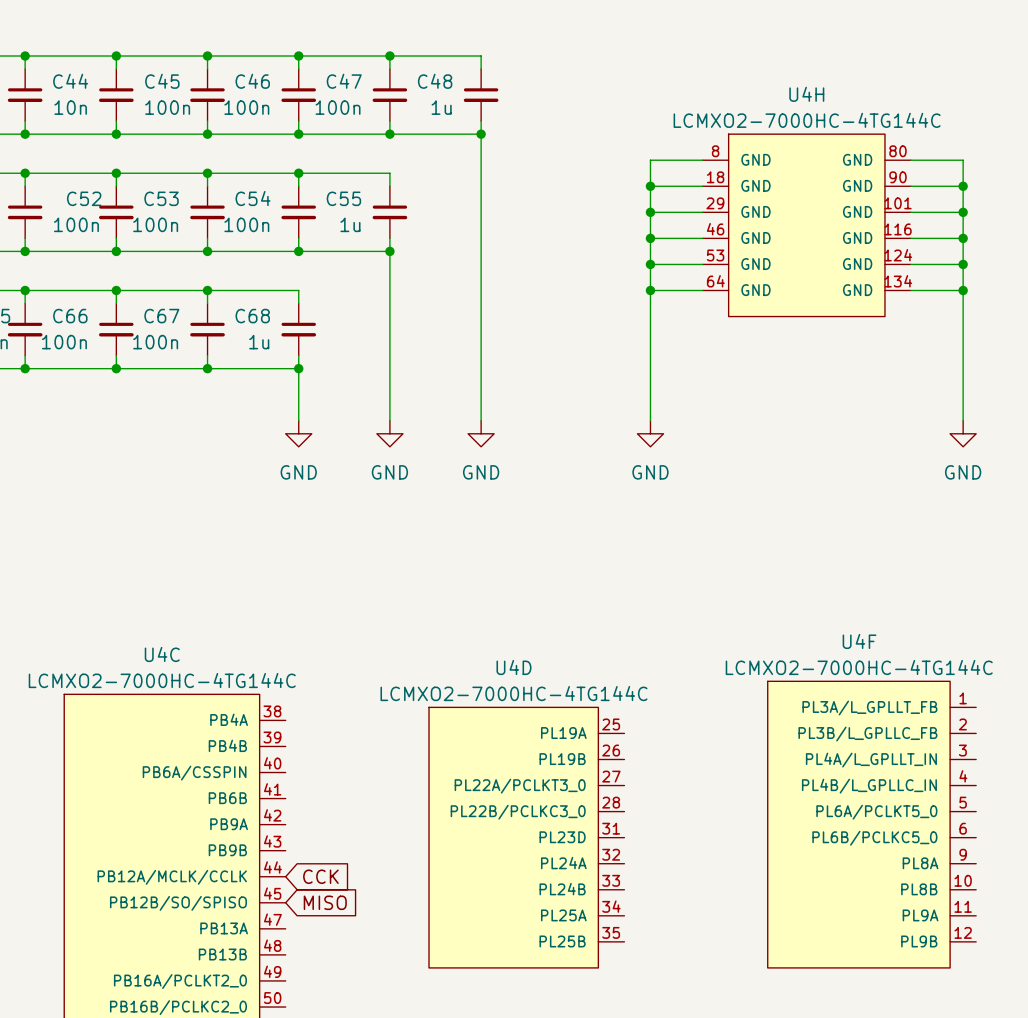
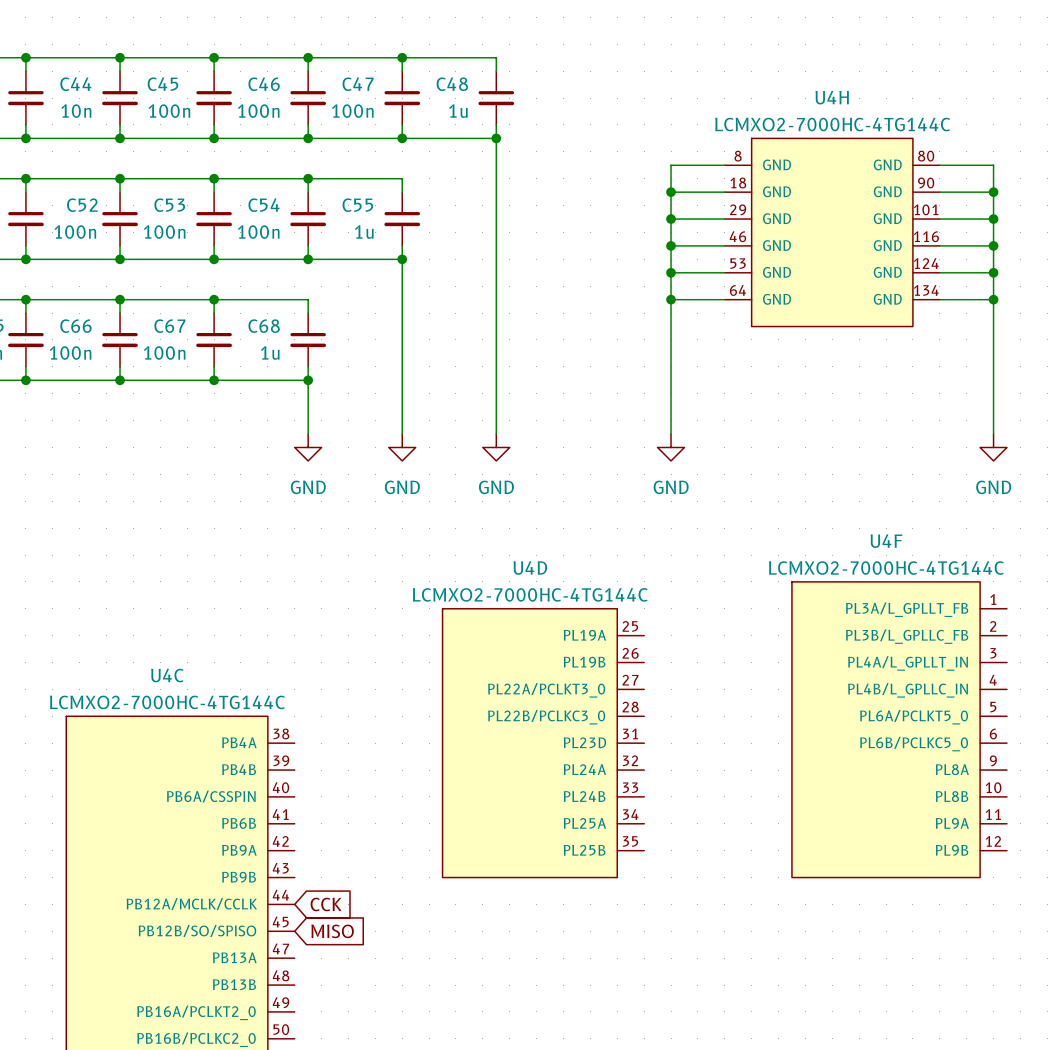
U4F position: (871, 824) -> (899, 729)
U4D position: (526, 837) -> (543, 743)

